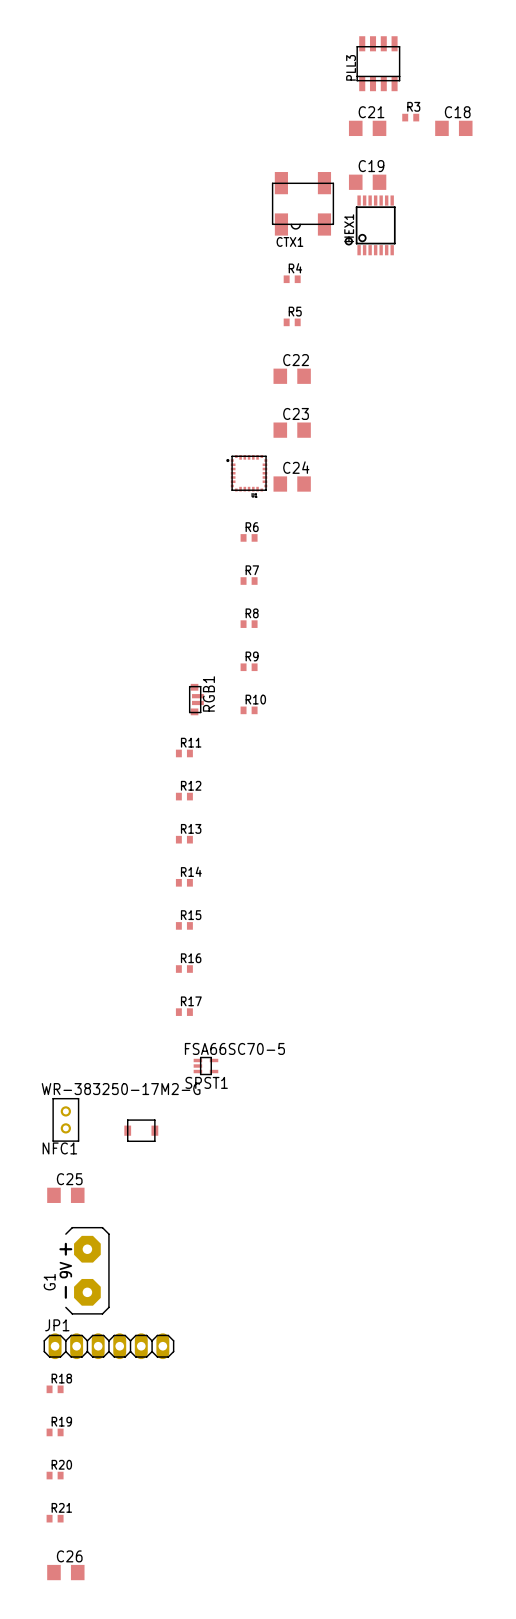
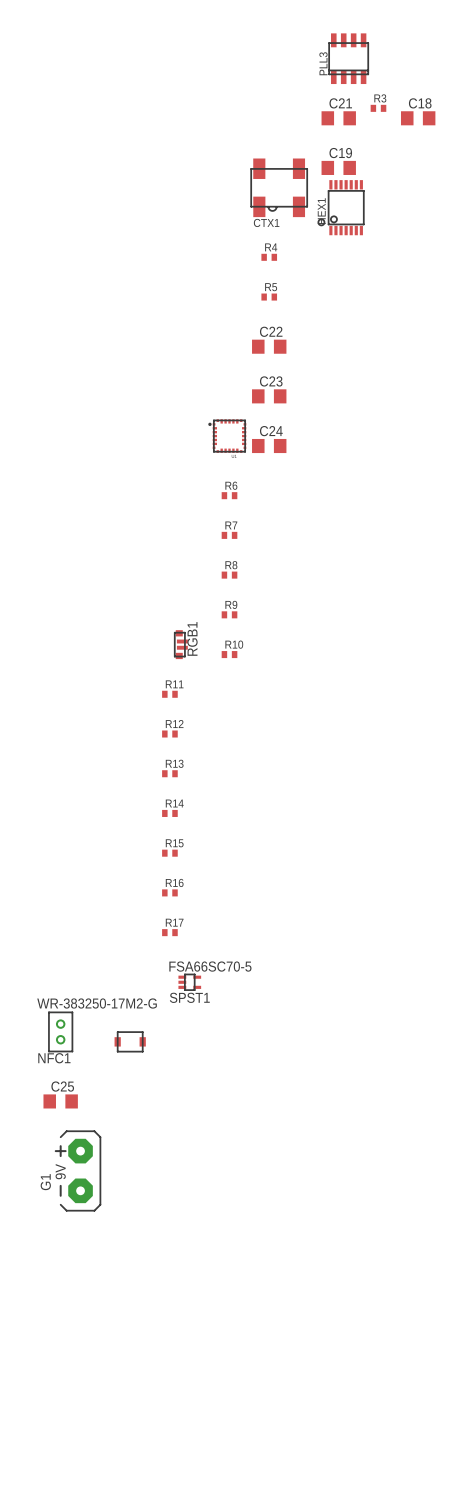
JP1: (108, 1346) -> none
R18: (55, 1389) -> none
R19: (55, 1432) -> none
R20: (55, 1475) -> none
R21: (55, 1518) -> none
C26: (65, 1572) -> none

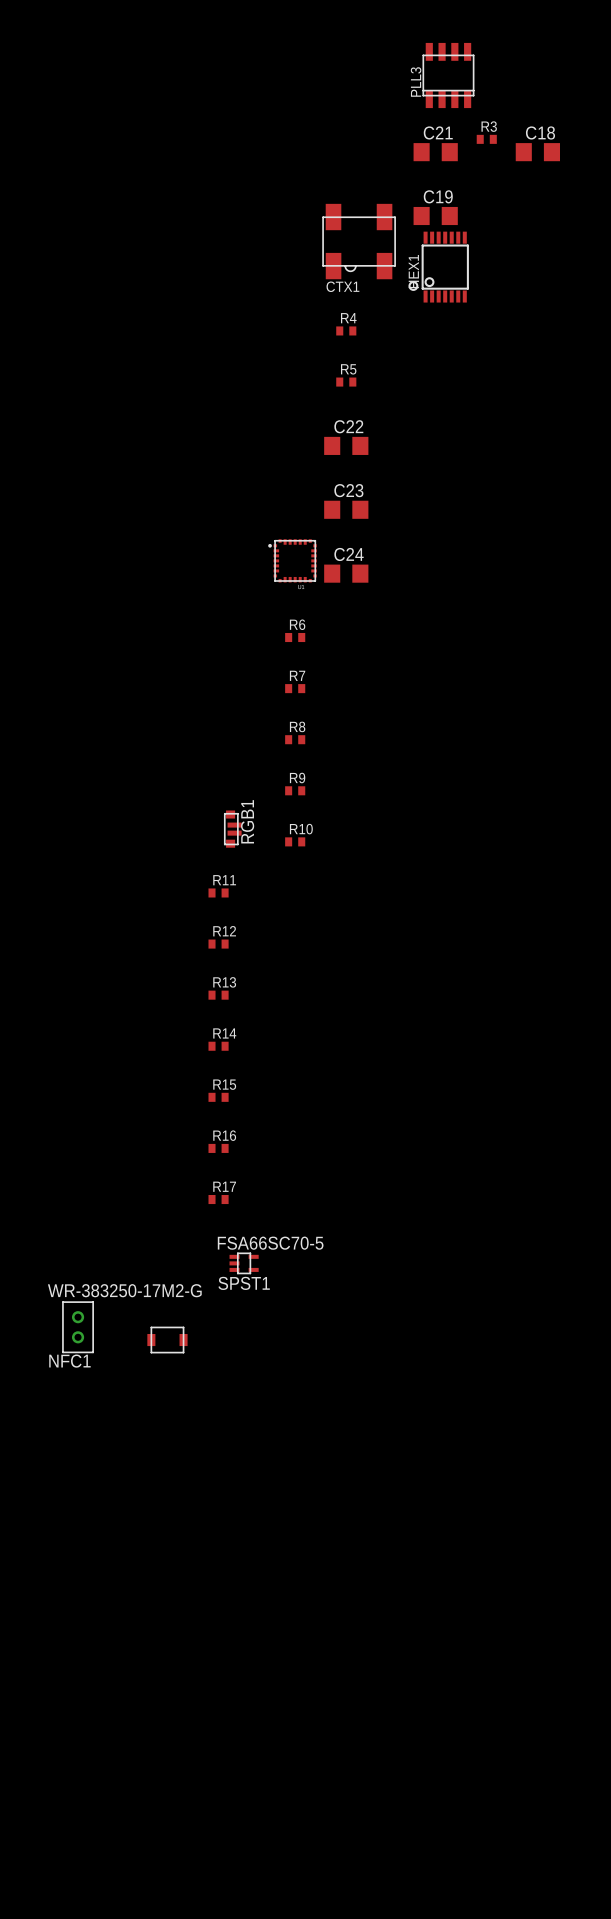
C25: (60, 1101) -> none
G1: (77, 1170) -> none

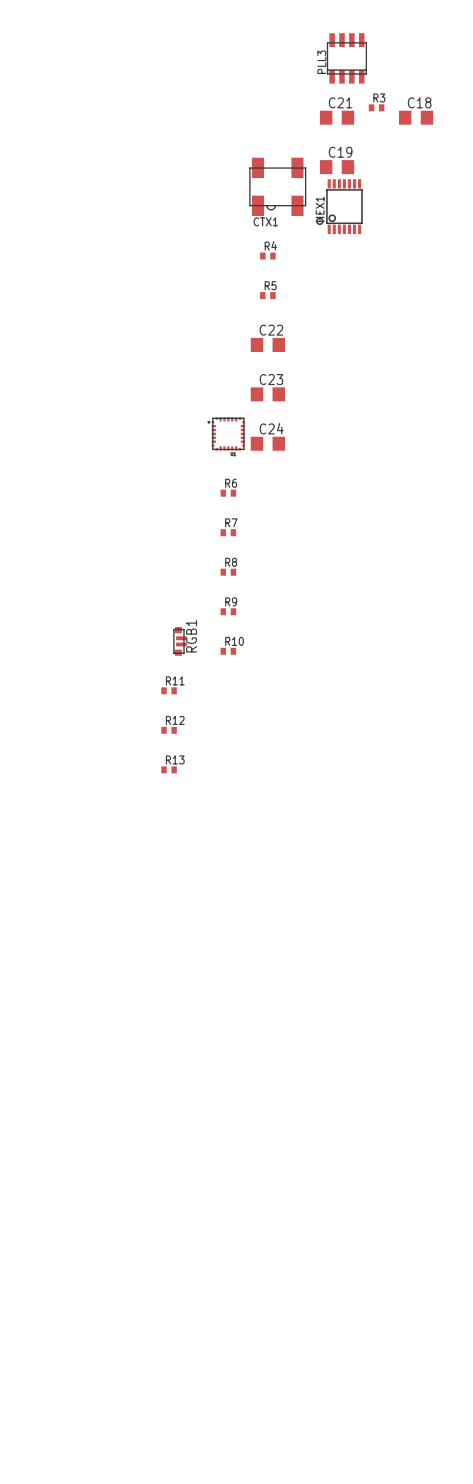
R14: (218, 1046) -> none
R15: (218, 1097) -> none
R16: (218, 1148) -> none
R17: (218, 1199) -> none
SPST1: FSA66SC70-5 (244, 1263) -> none
NFC1: WR-383250-17M2-G (78, 1327) -> none
part: (167, 1340) -> none

